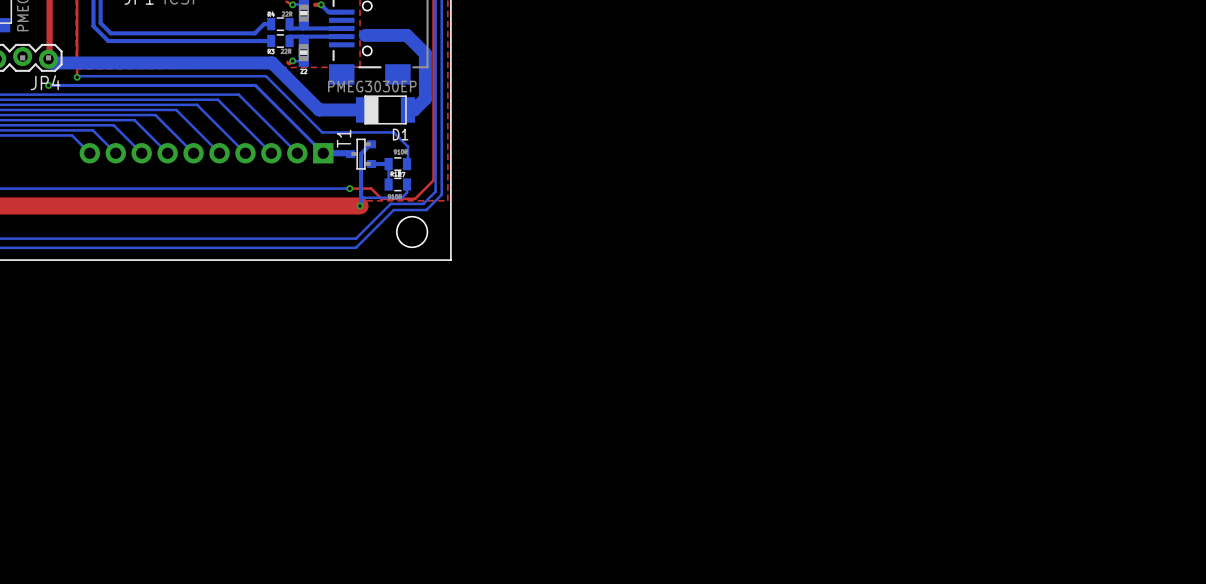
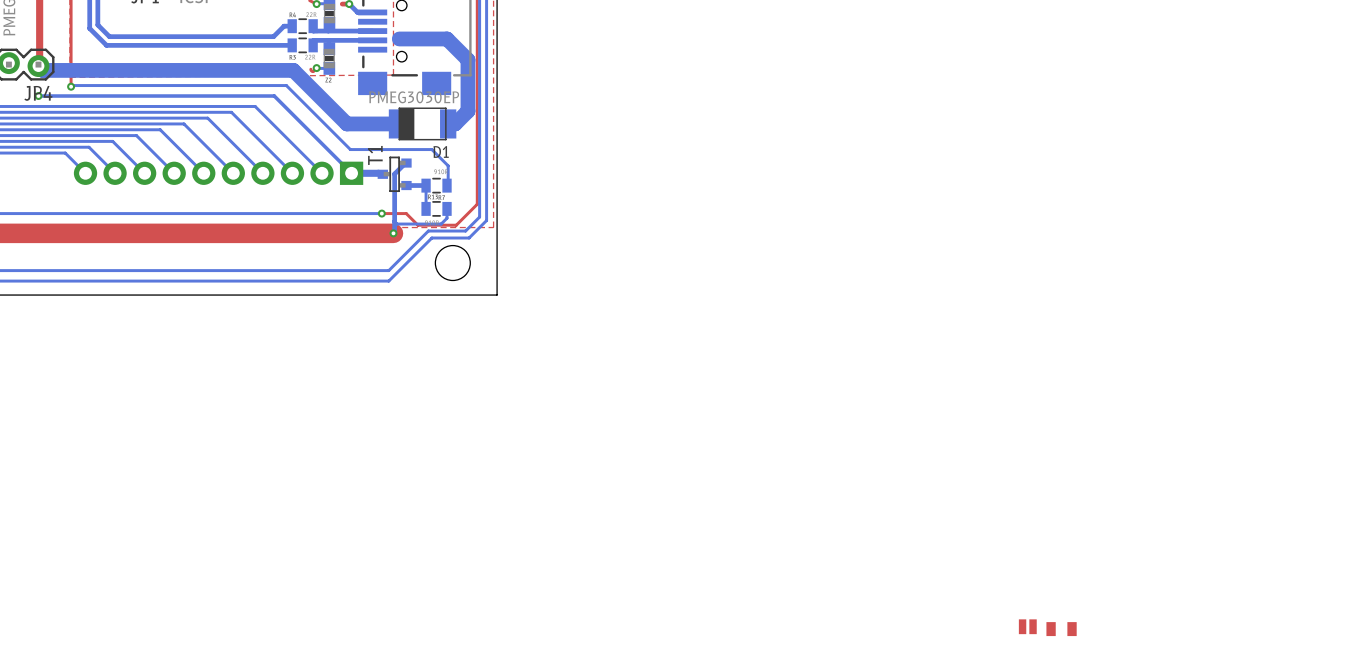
part: none -> (1027, 626)
part: none -> (1061, 629)

